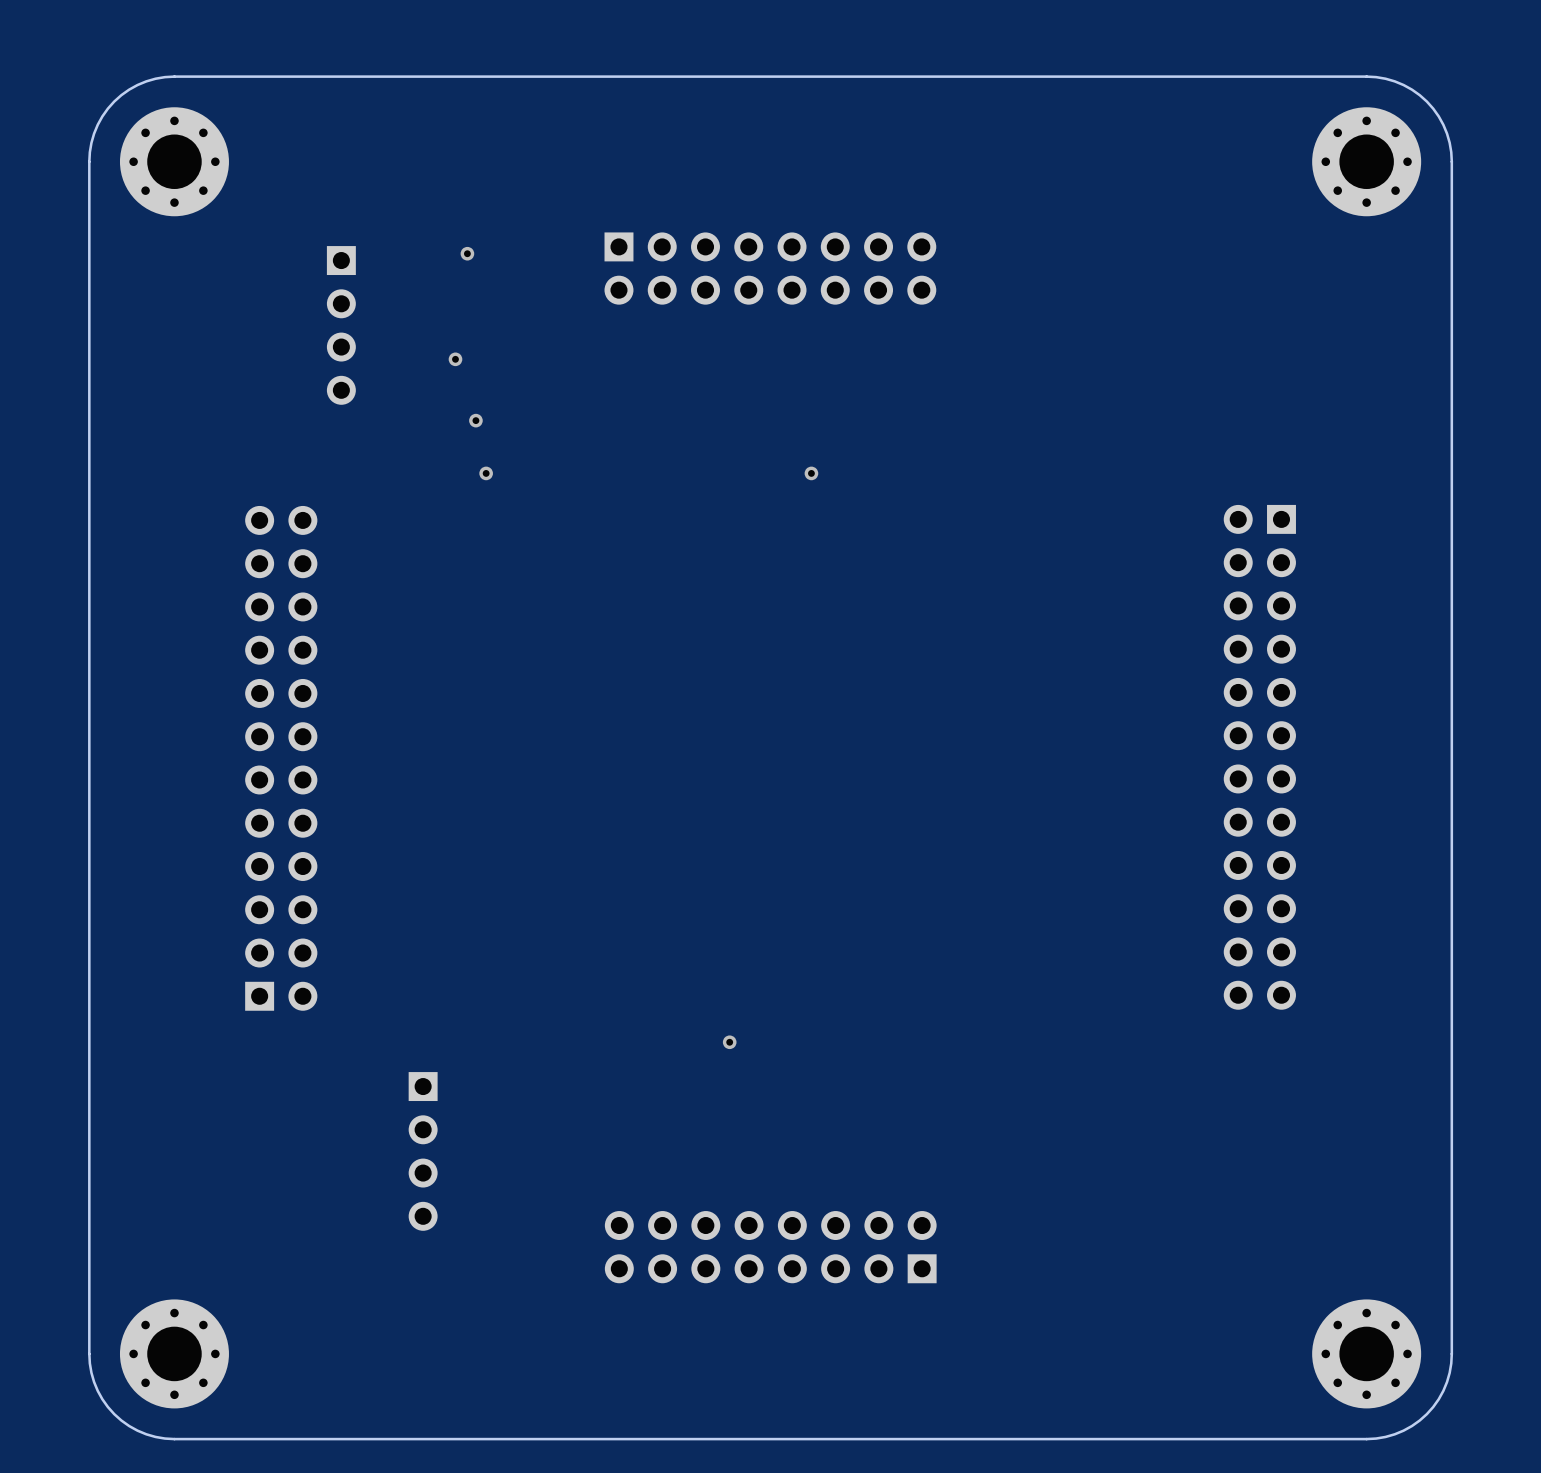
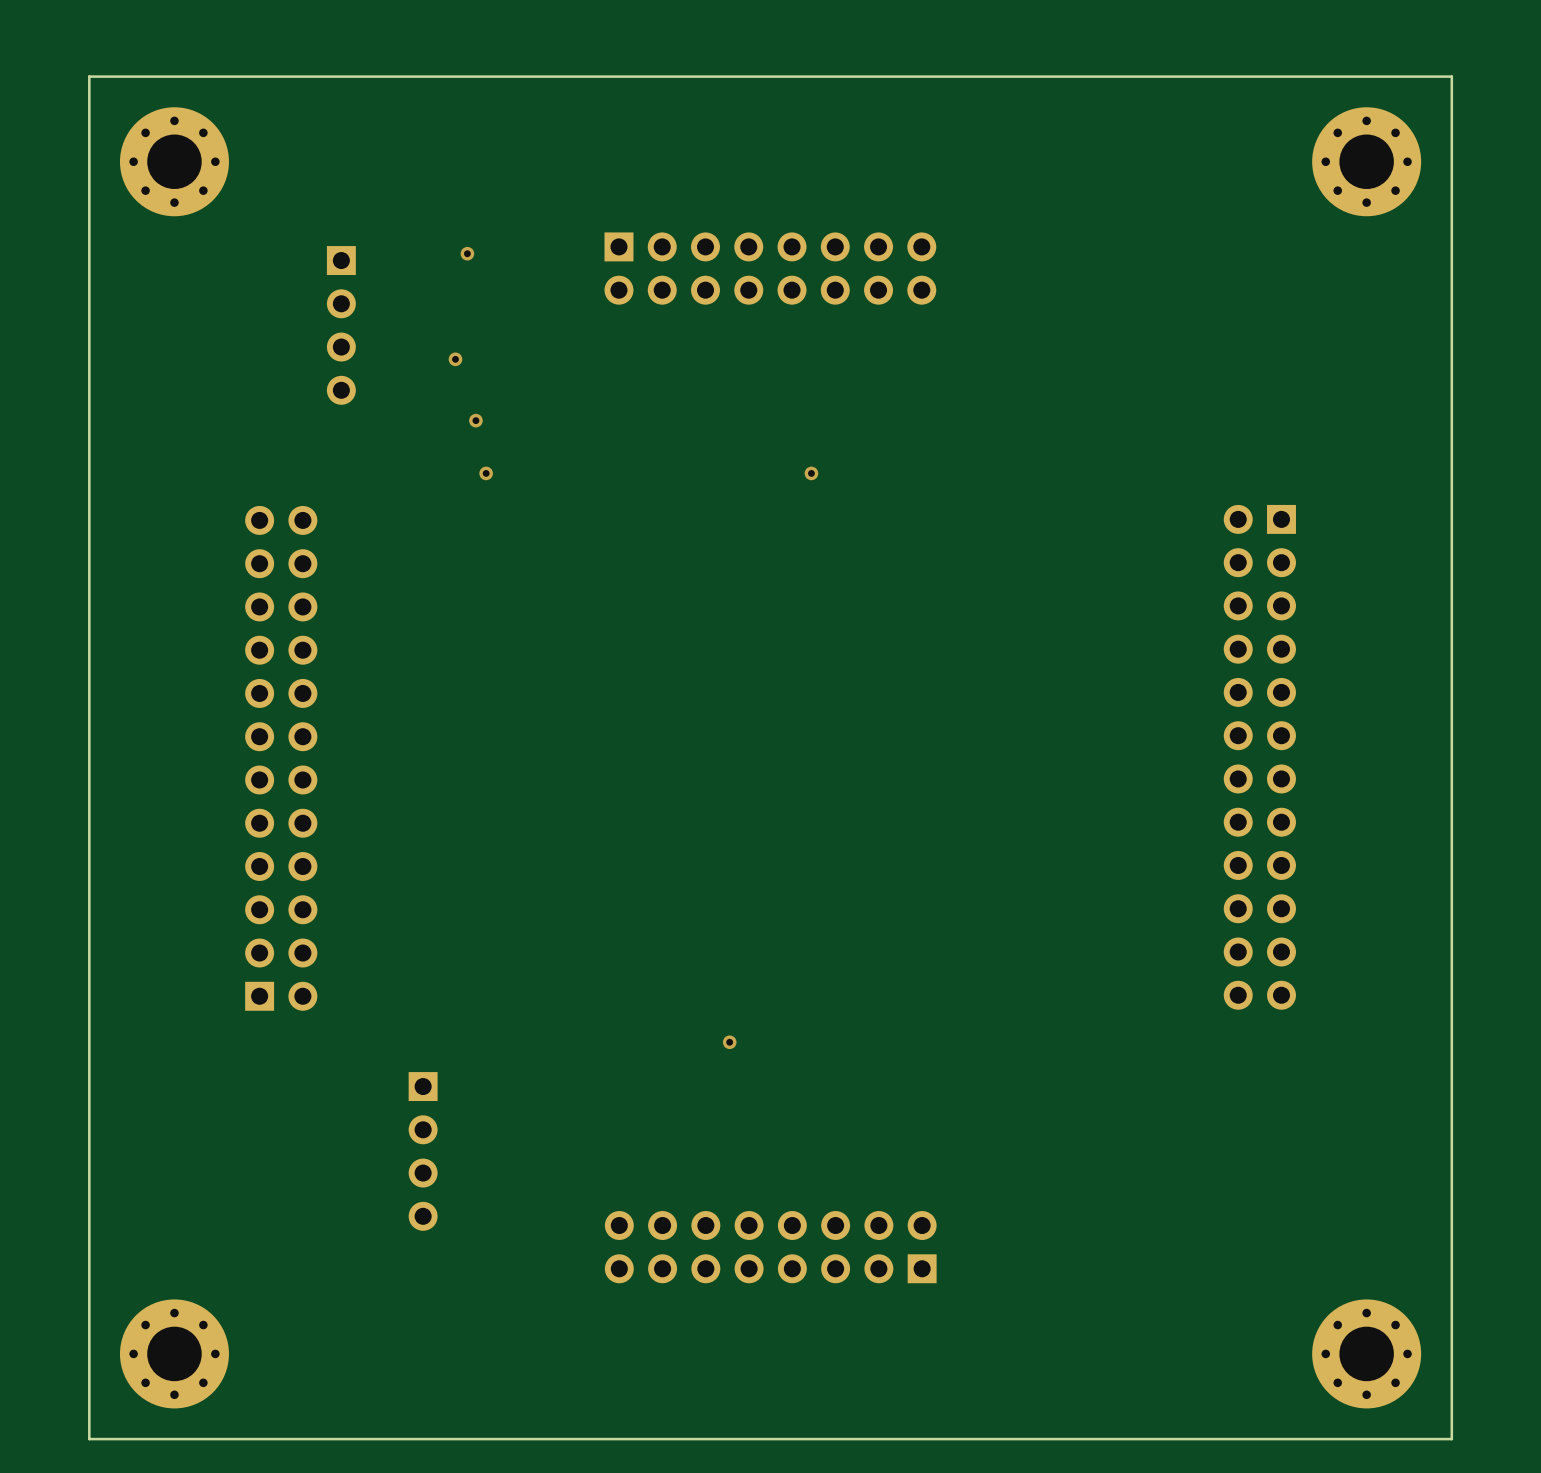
board edge: (174, 76) (146, 81) (129, 89) (114, 101) (102, 116) (94, 133) (89, 161) -> (174, 76) (89, 76) (89, 161)
board edge: (1366, 76) (1385, 78) (1403, 85) (1426, 101) (1443, 124) (1449, 142) (1451, 161) -> (1366, 76) (1451, 76) (1451, 161)
board edge: (89, 1353) (94, 1382) (102, 1399) (114, 1414) (129, 1426) (146, 1434) (174, 1439) -> (89, 1353) (89, 1439) (174, 1439)
board edge: (1451, 1353) (1447, 1382) (1438, 1399) (1426, 1414) (1411, 1426) (1394, 1434) (1366, 1439) -> (1451, 1353) (1451, 1439) (1366, 1439)

